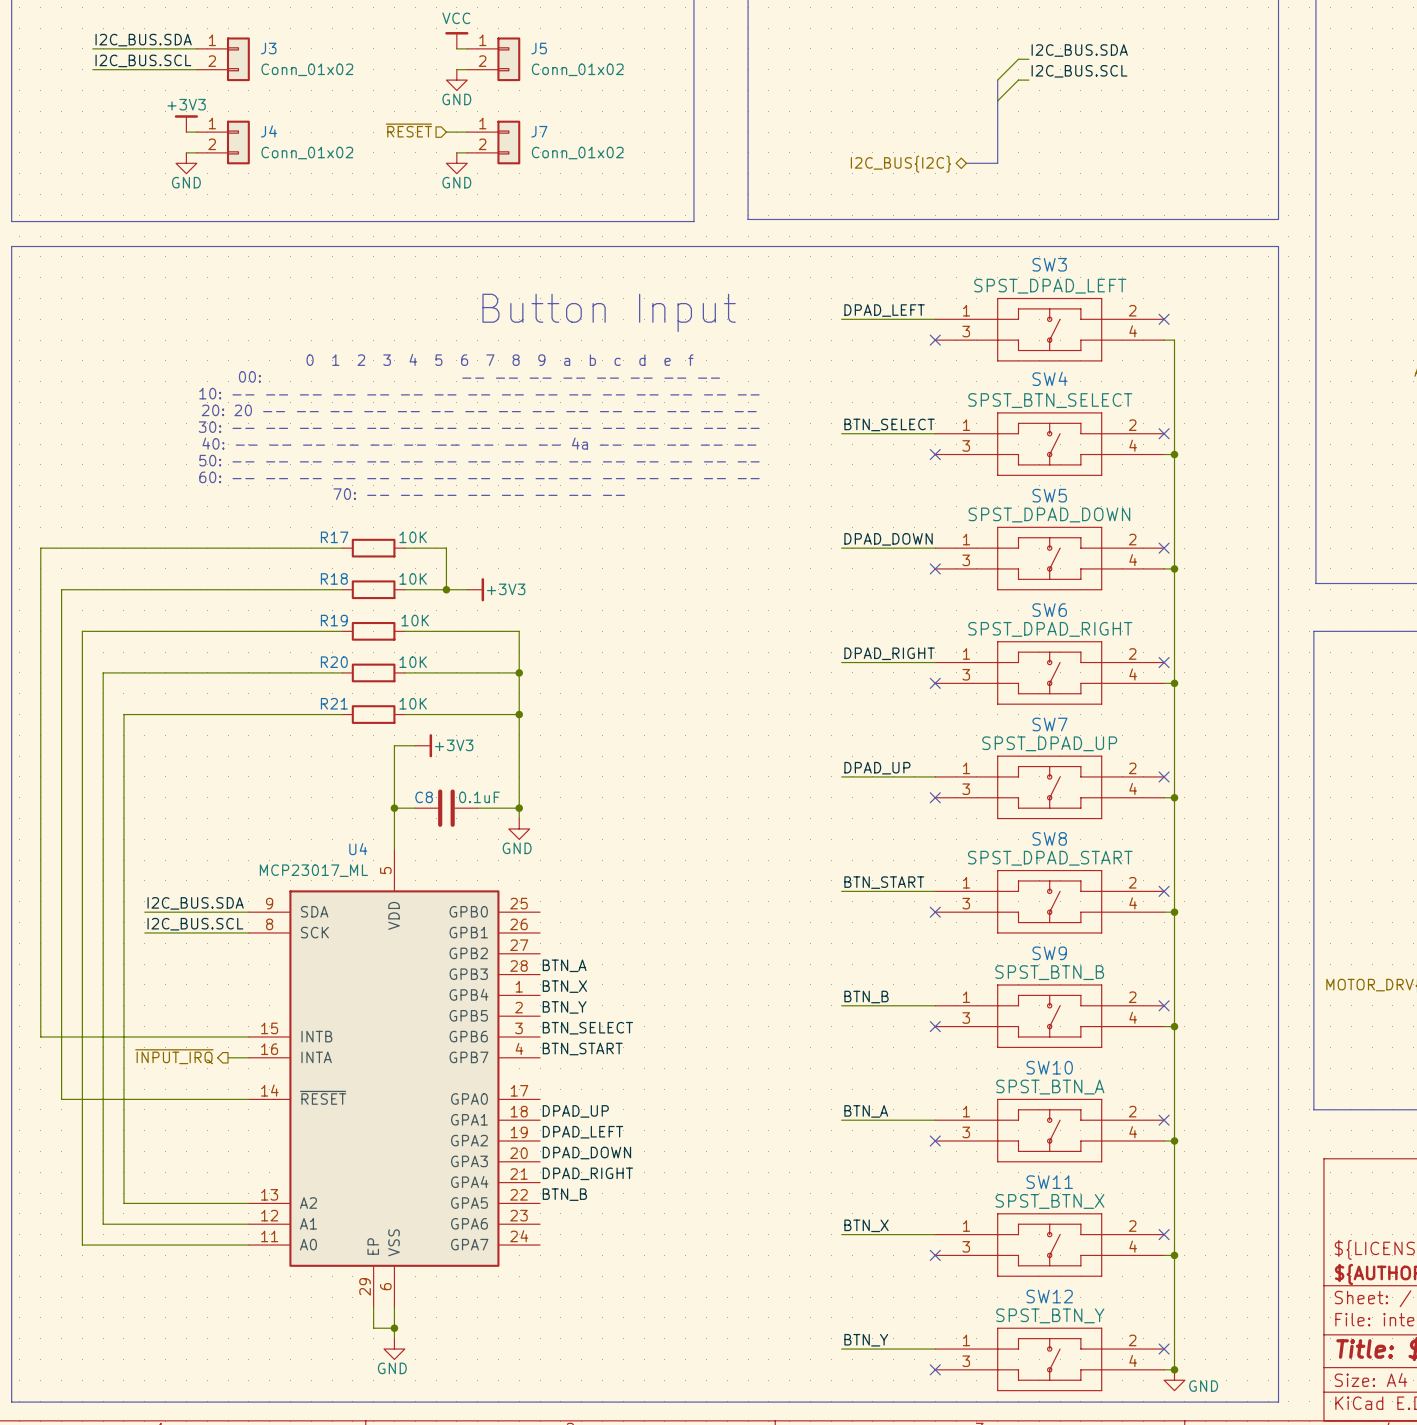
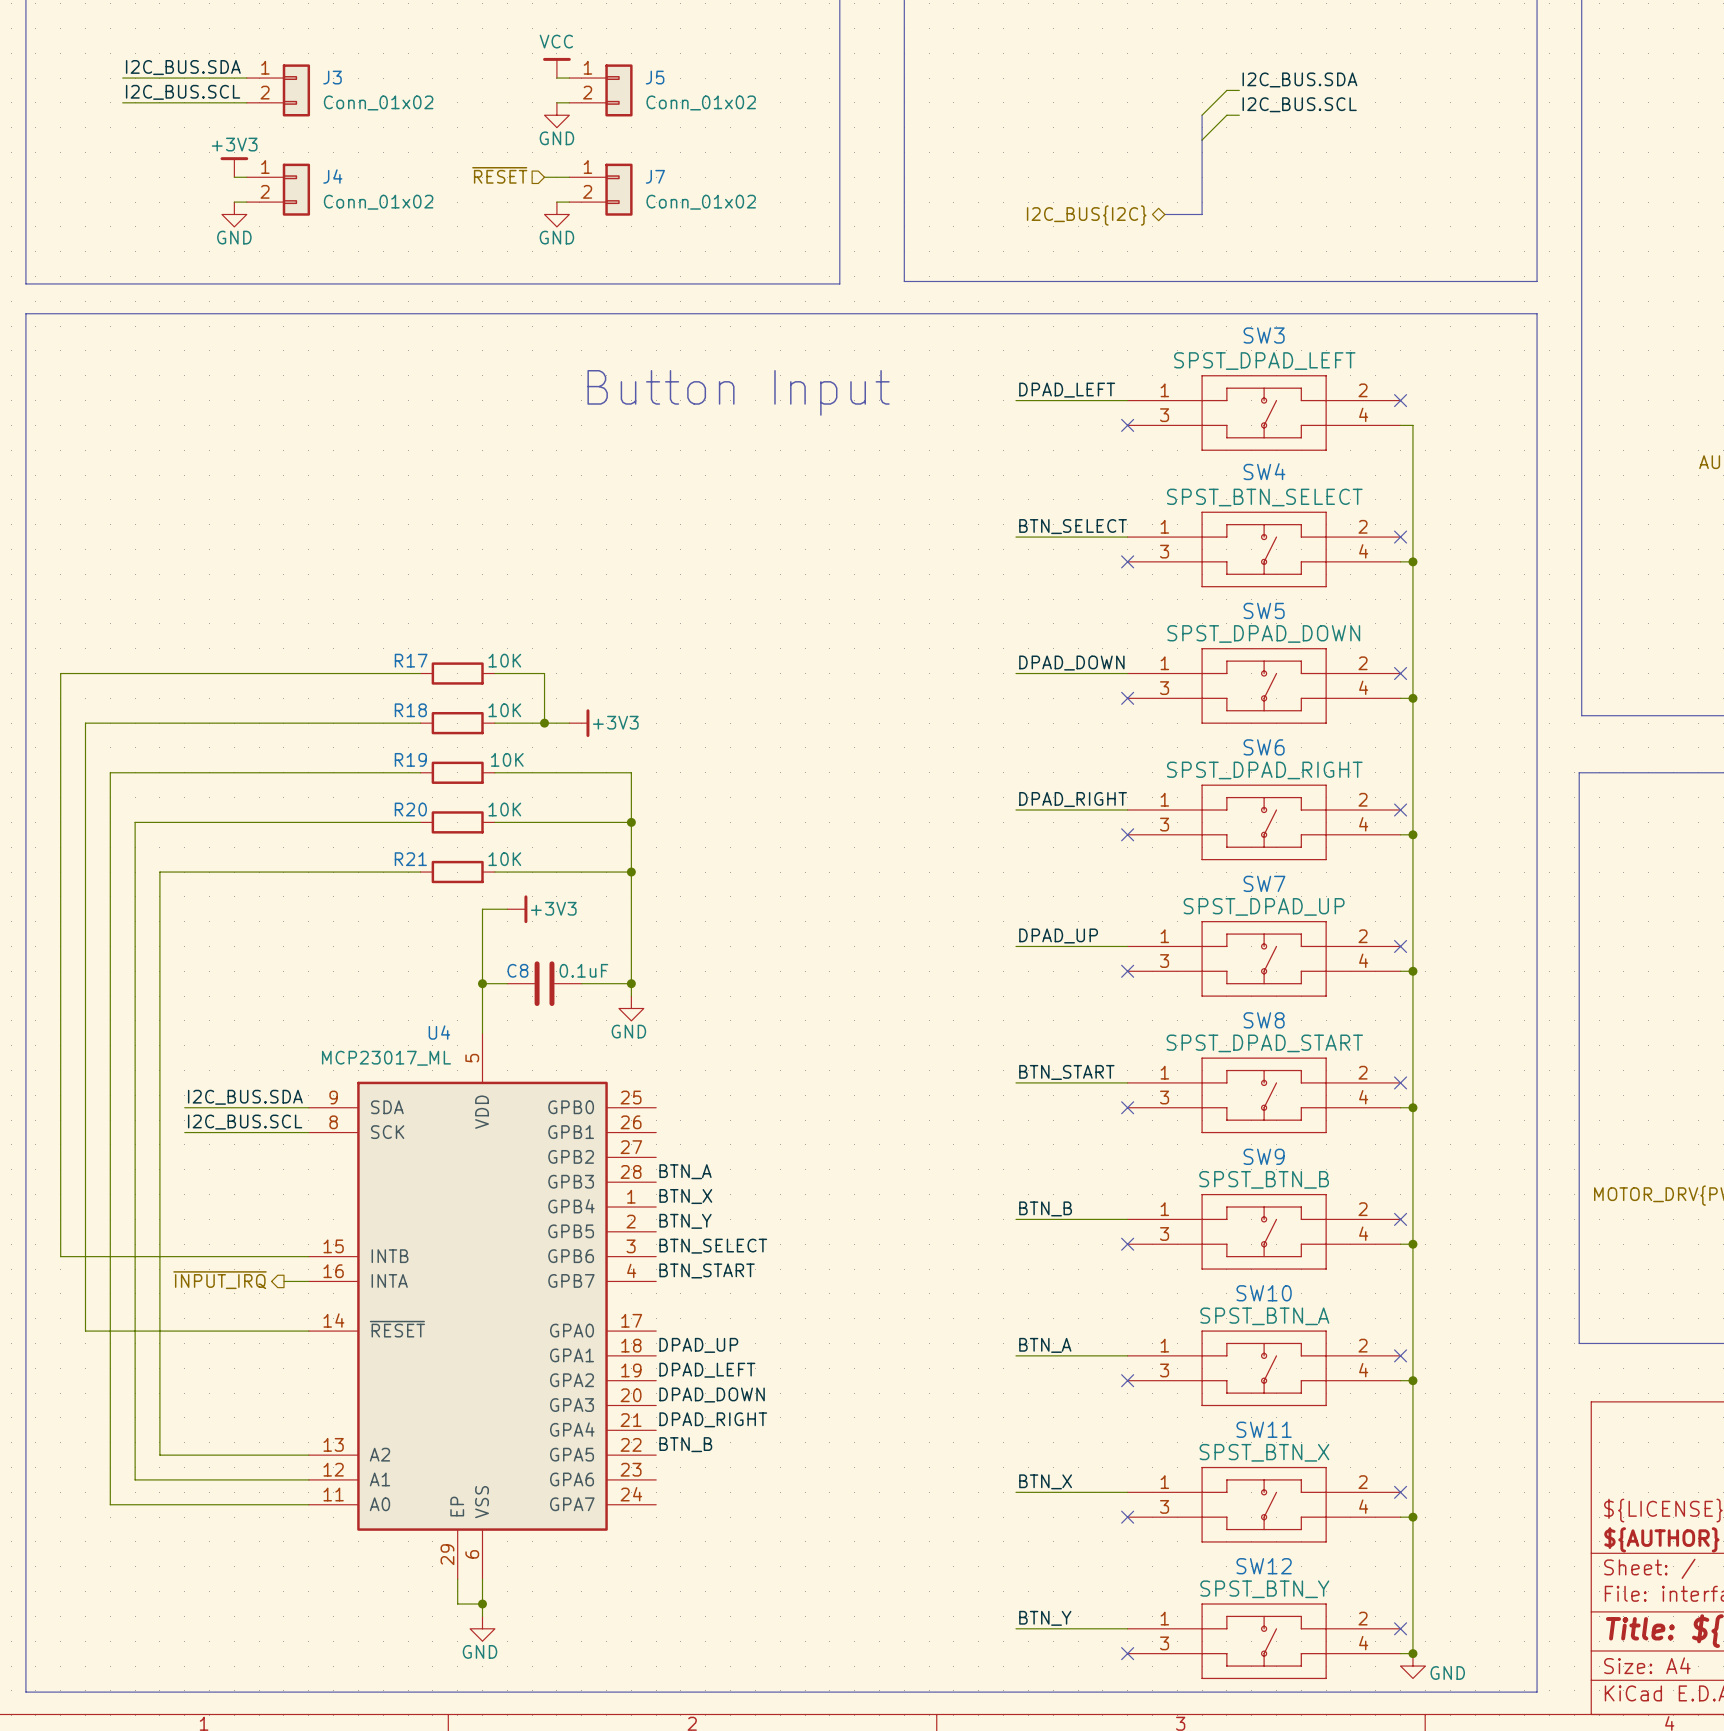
text: 0 1 2 3 4 5 6 7 8 9 a b c d e f (500, 359) -> none
text: 00: -- -- -- -- -- -- -- -- (479, 376) -> none
text: 10: -- -- -- -- -- -- -- -- -- -- -- -- -- -- -- -- (479, 393) -> none
text: 20: 20 -- -- -- -- -- -- -- -- -- -- -- -- -- -- -- (479, 410) -> none
text: 30: -- -- -- -- -- -- -- -- -- -- -- -- -- -- -- -- (479, 427) -> none
text: 40: -- -- -- -- -- -- -- -- -- -- 4a -- -- -- -- -- (479, 443) -> none
text: 50: -- -- -- -- -- -- -- -- -- -- -- -- -- -- -- -- (479, 460) -> none
text: 60: -- -- -- -- -- -- -- -- -- -- -- -- -- -- -- -- (479, 477) -> none
text: 70: -- -- -- -- -- -- -- -- (479, 494) -> none

